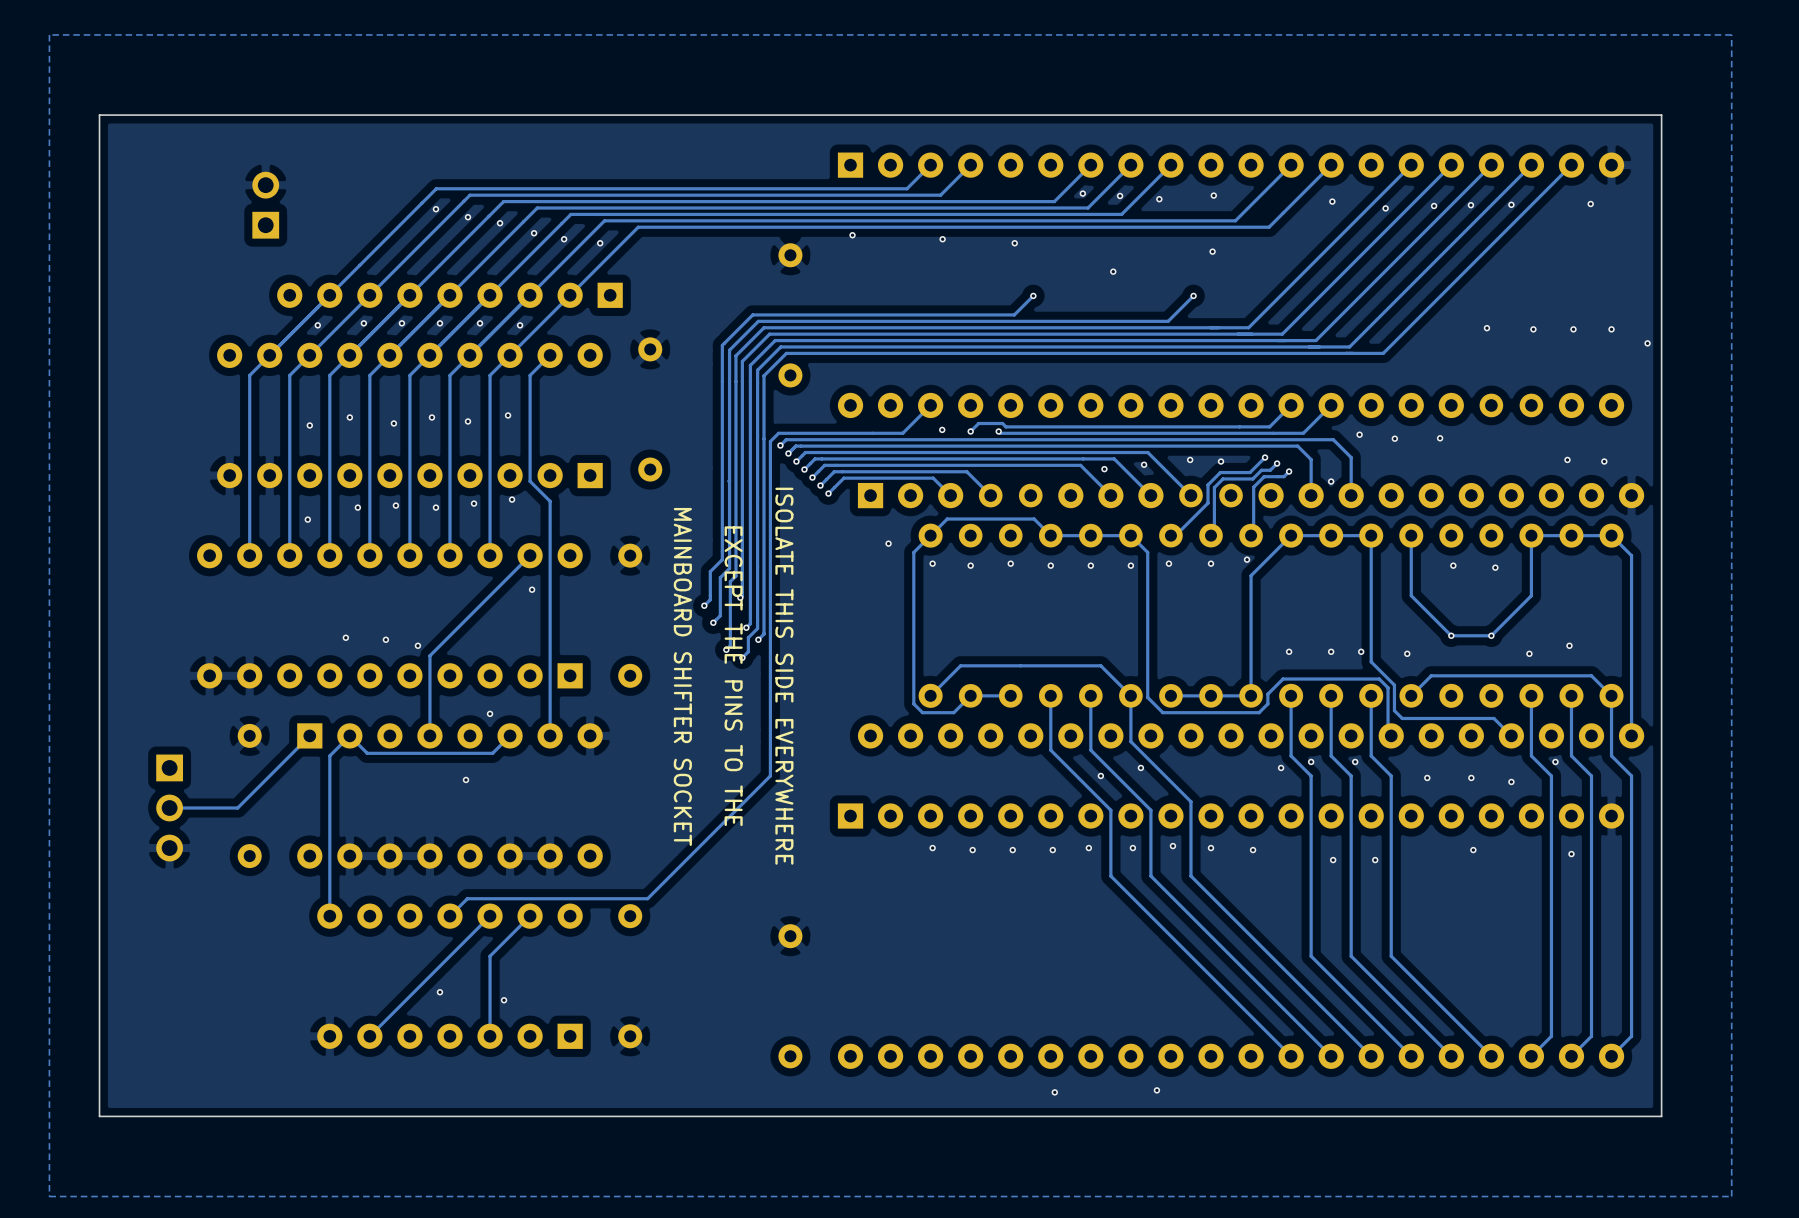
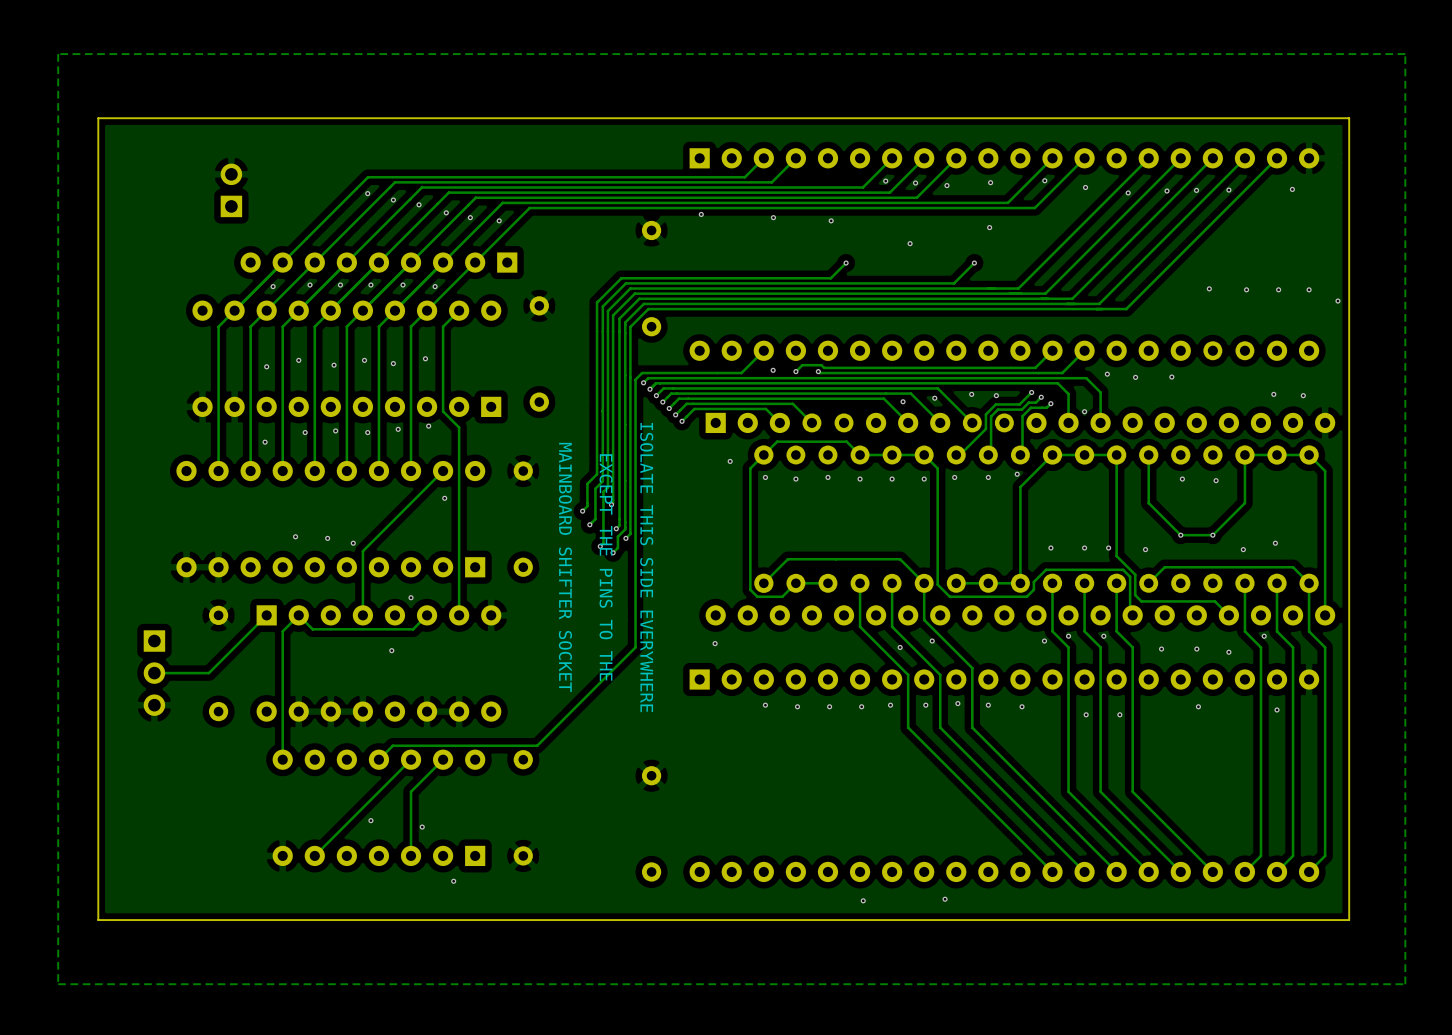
via: none -> (1044, 180)
via: none -> (715, 643)
via: none -> (453, 881)

